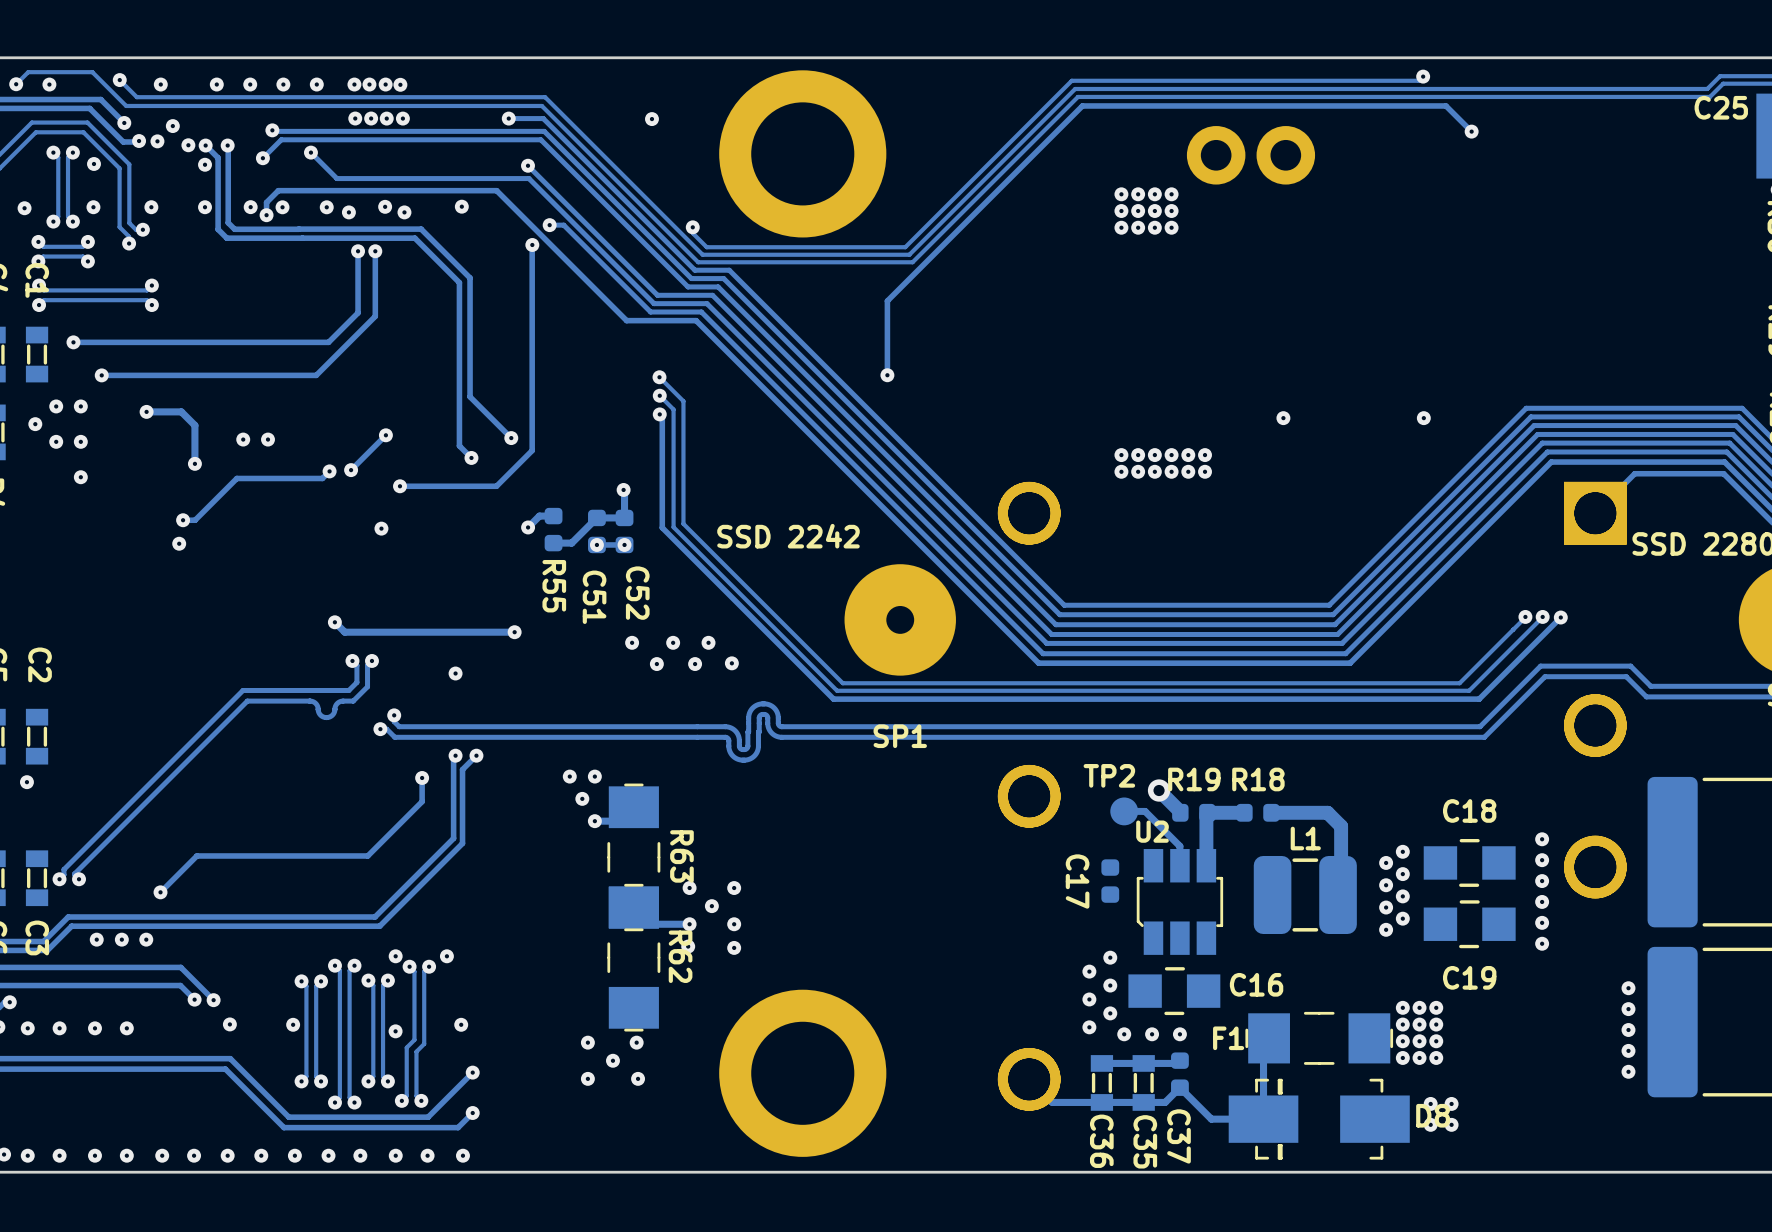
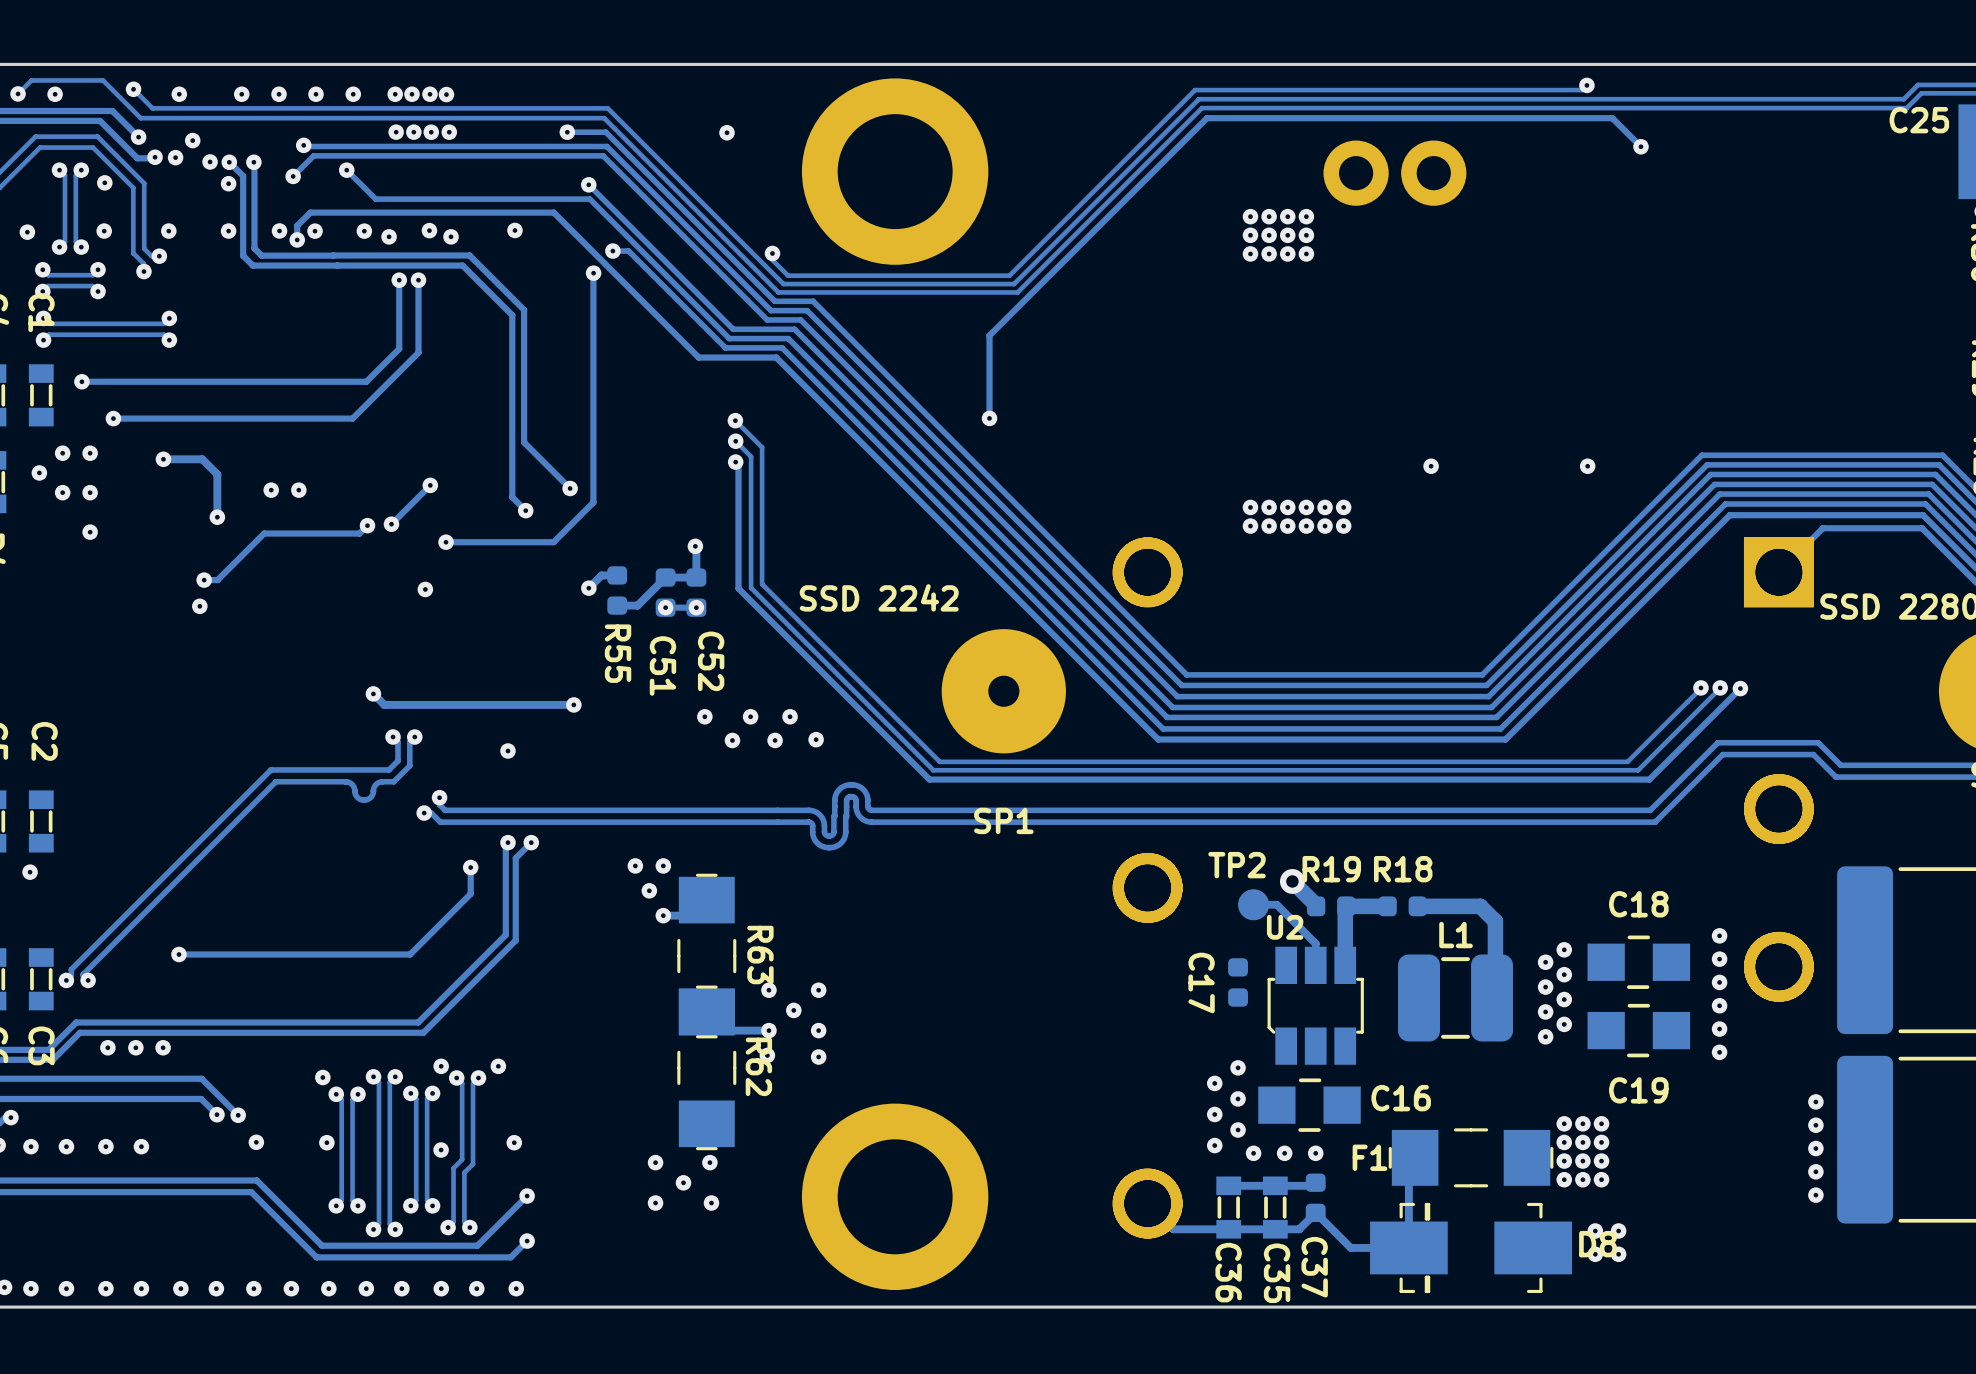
track: (196, 855) (160, 892) -> (219, 954) (178, 954)
via position: (160, 892) -> (178, 954)
via: none -> (322, 1077)

